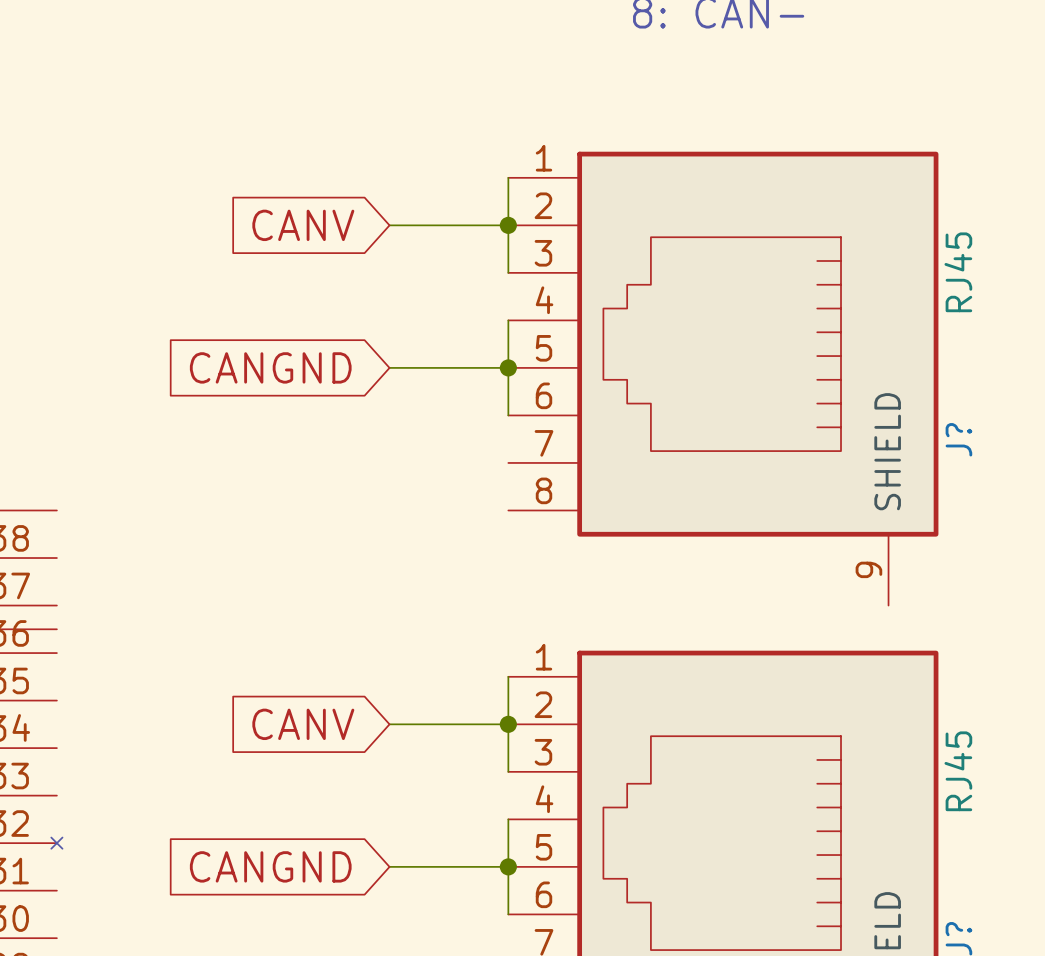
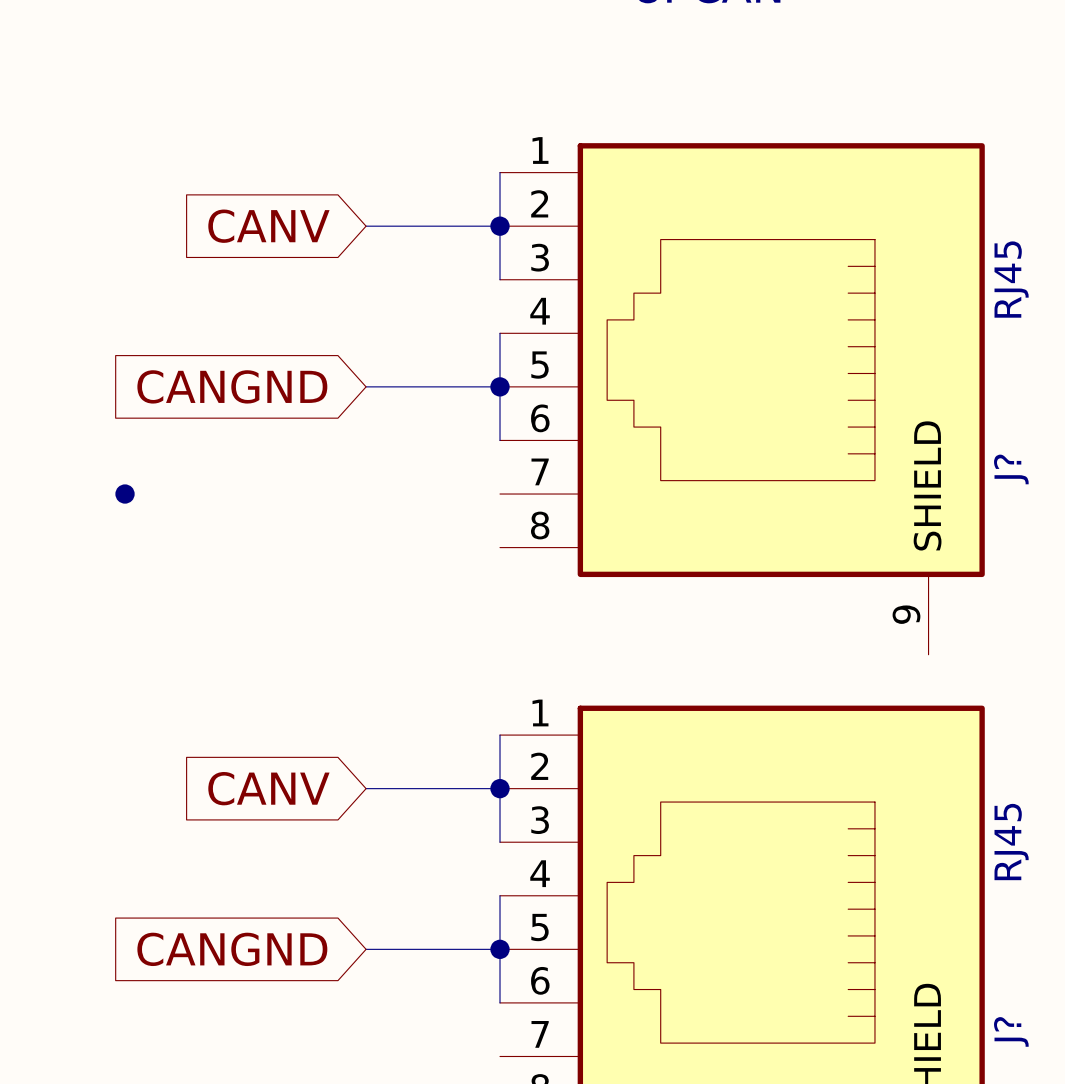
junction: none -> (125, 494)

